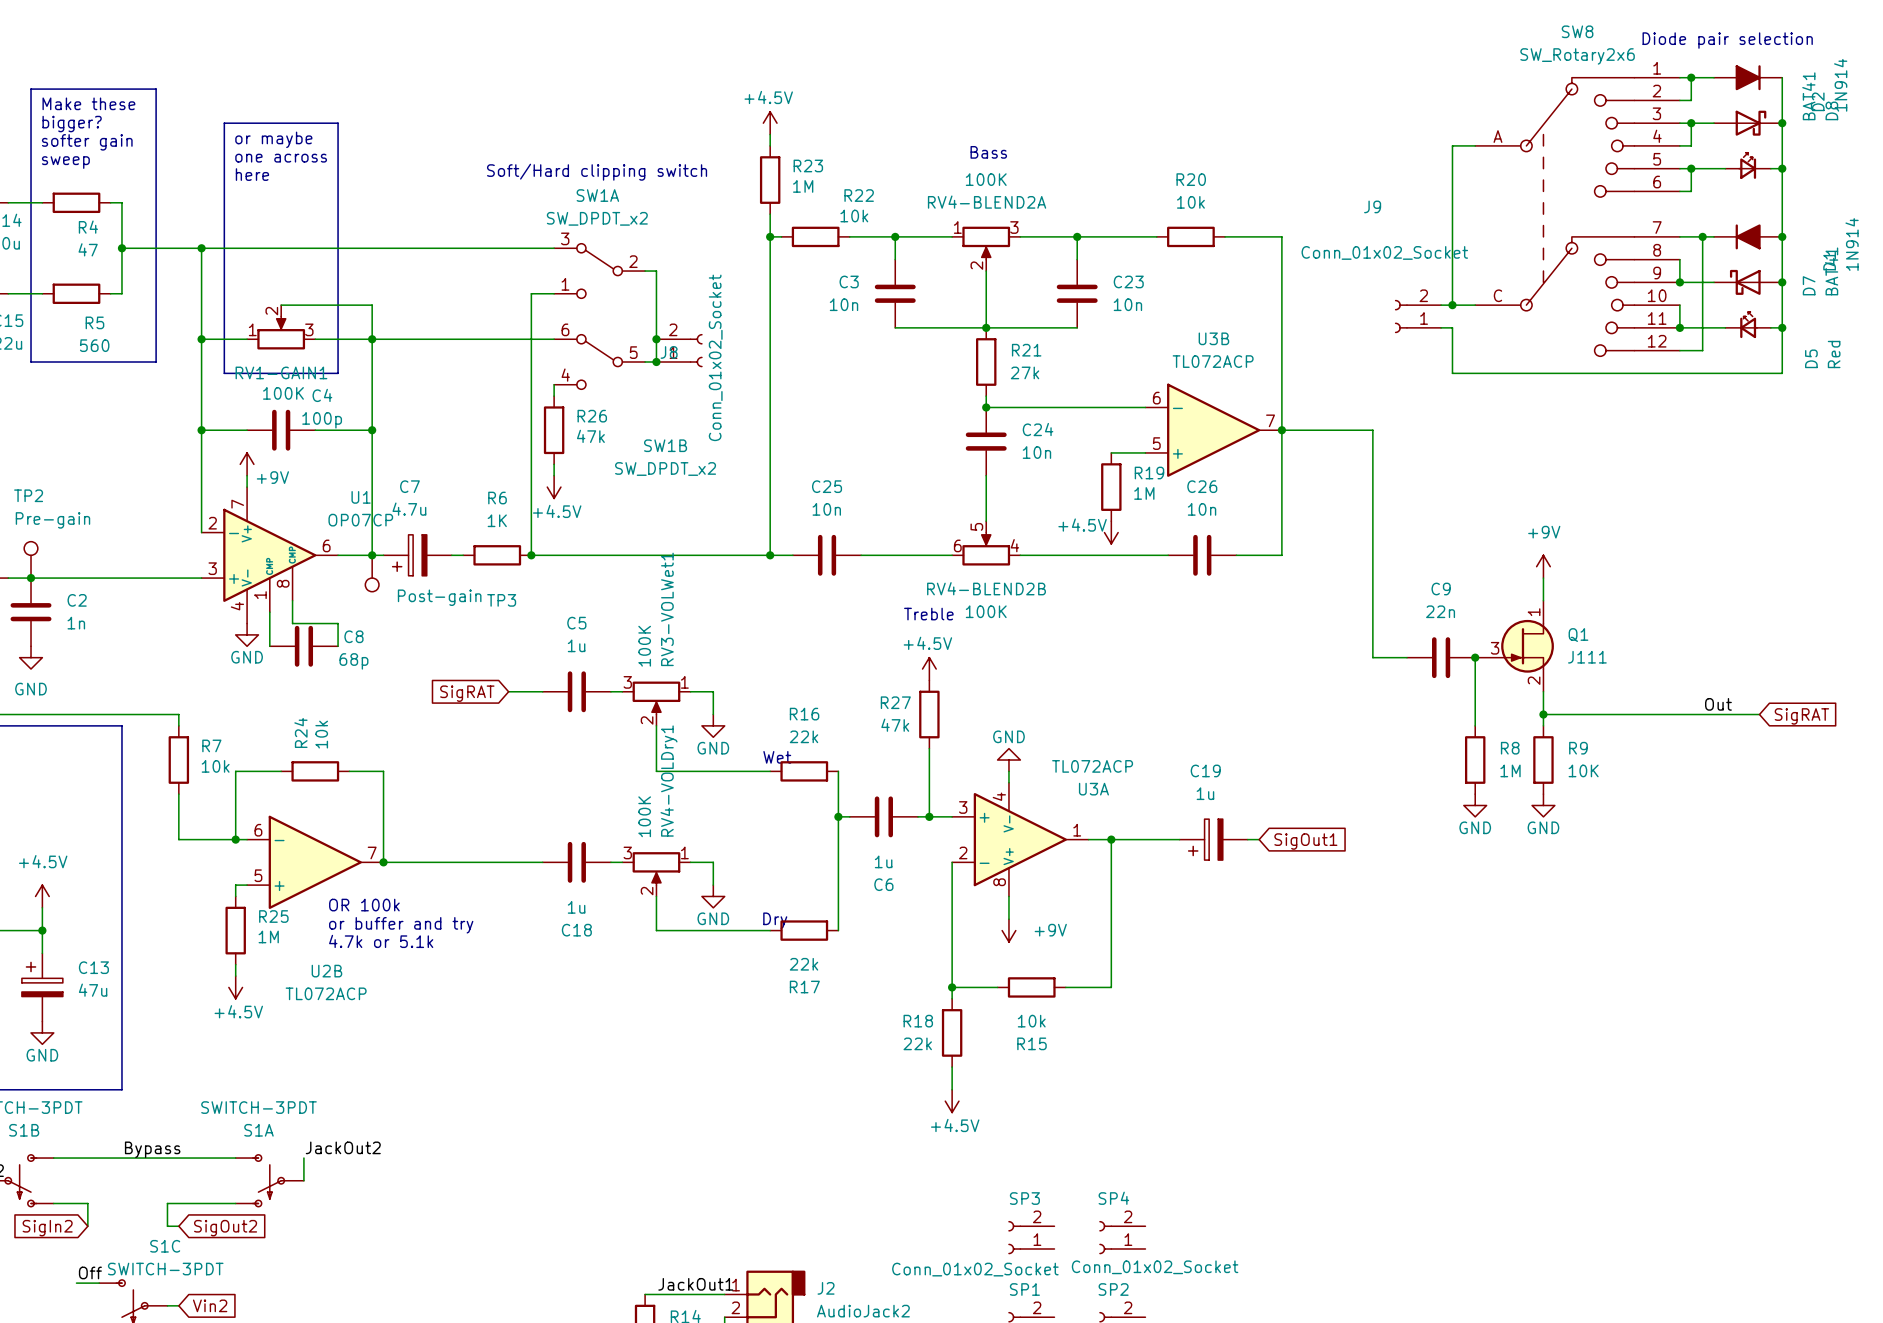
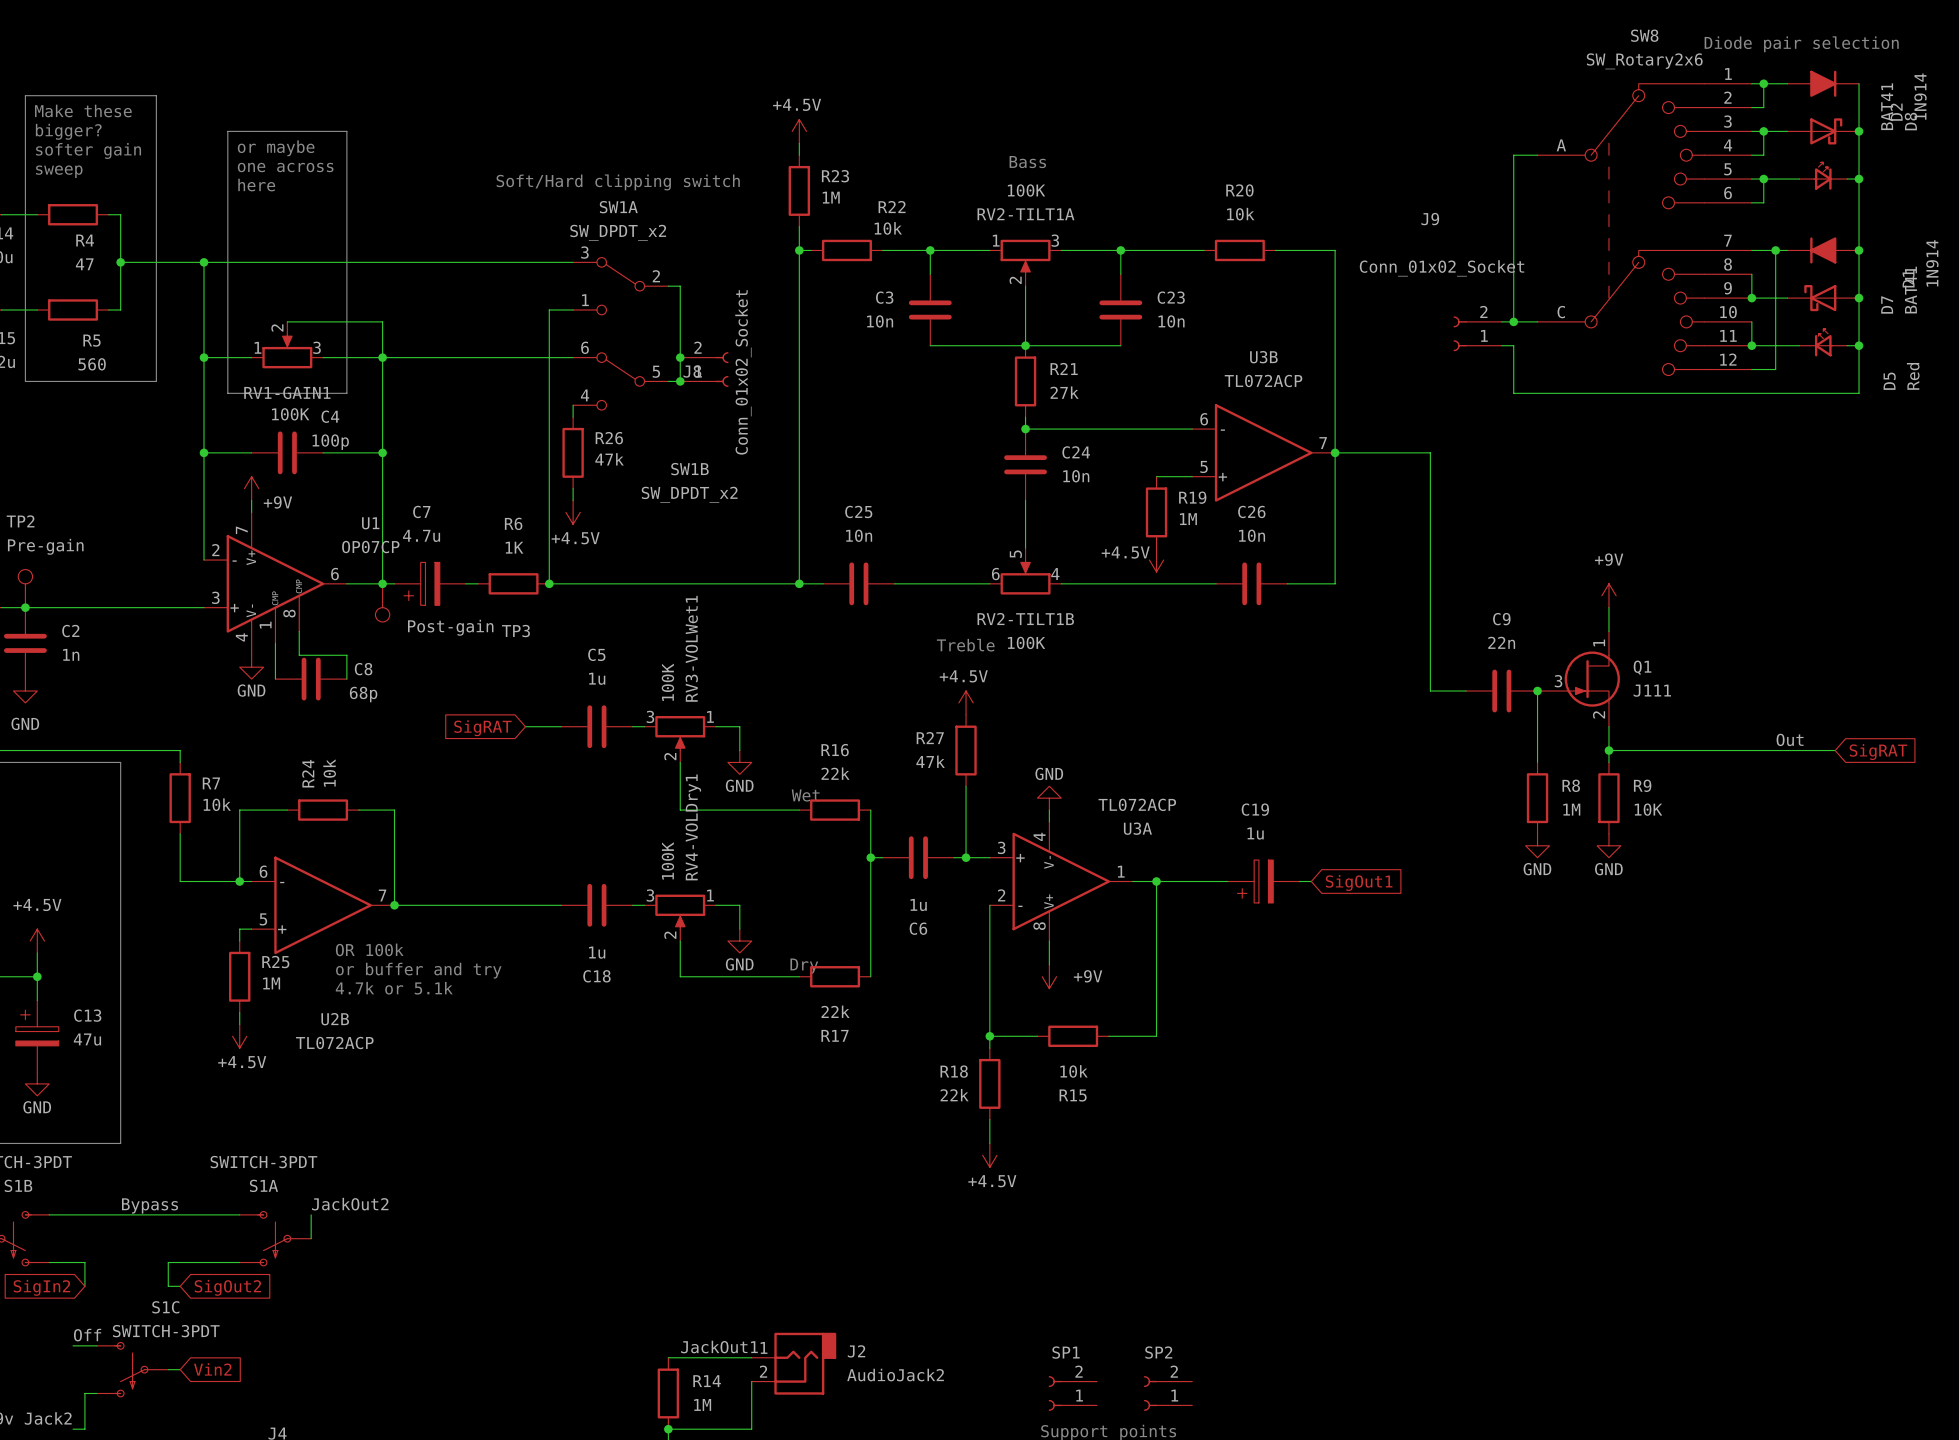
RV4-BLEND2A name: RV4-BLEND2A (987, 202) -> RV2-TILT1A (1025, 214)
RV4-BLEND2B name: RV4-BLEND2B (986, 588) -> RV2-TILT1B (1025, 619)
SP3: Conn_01x02_Socket (1031, 1237) -> none
SP4: Conn_01x02_Socket (1122, 1237) -> none

